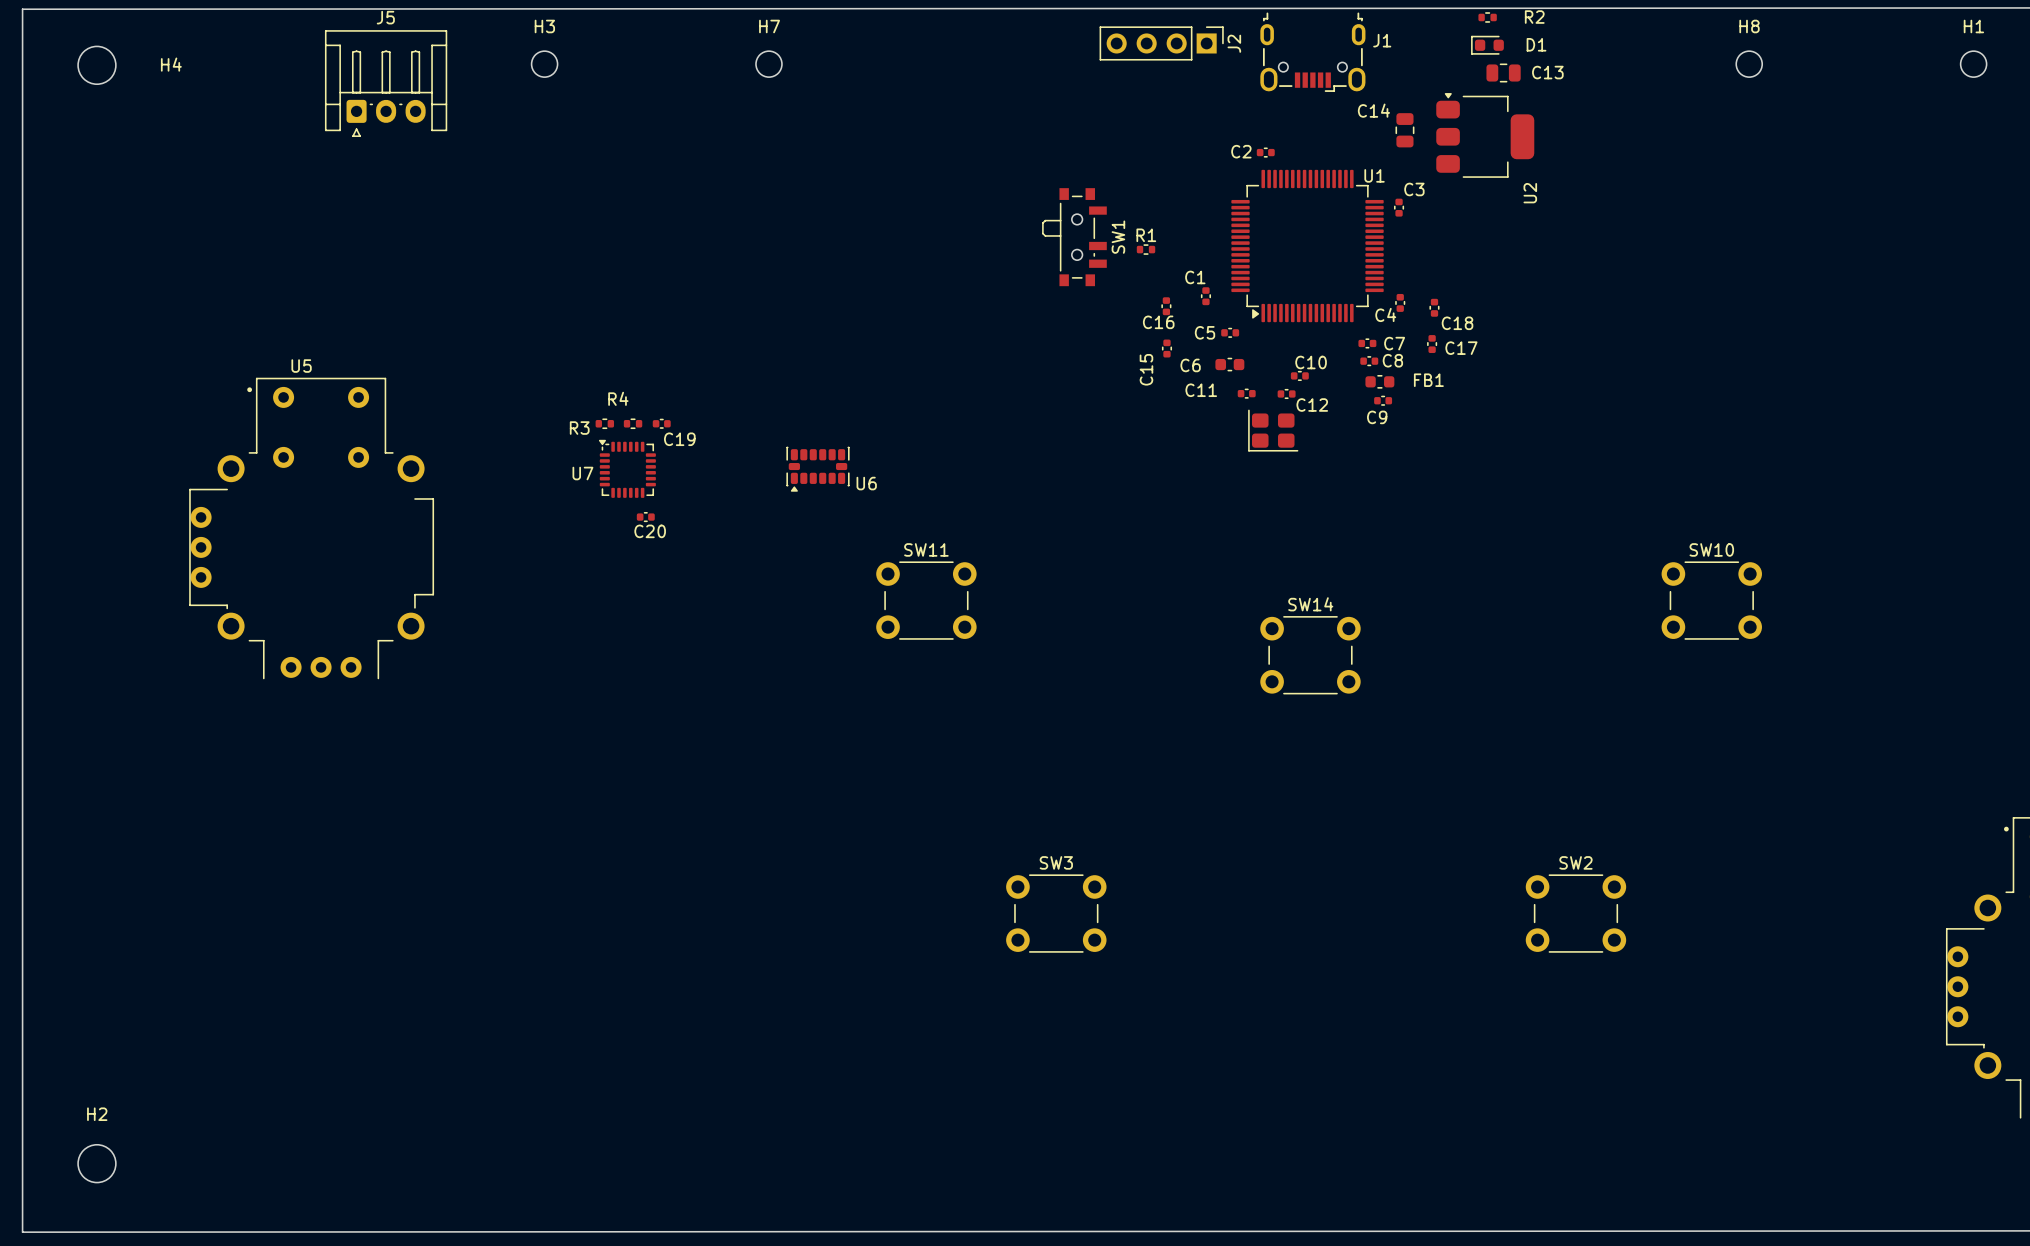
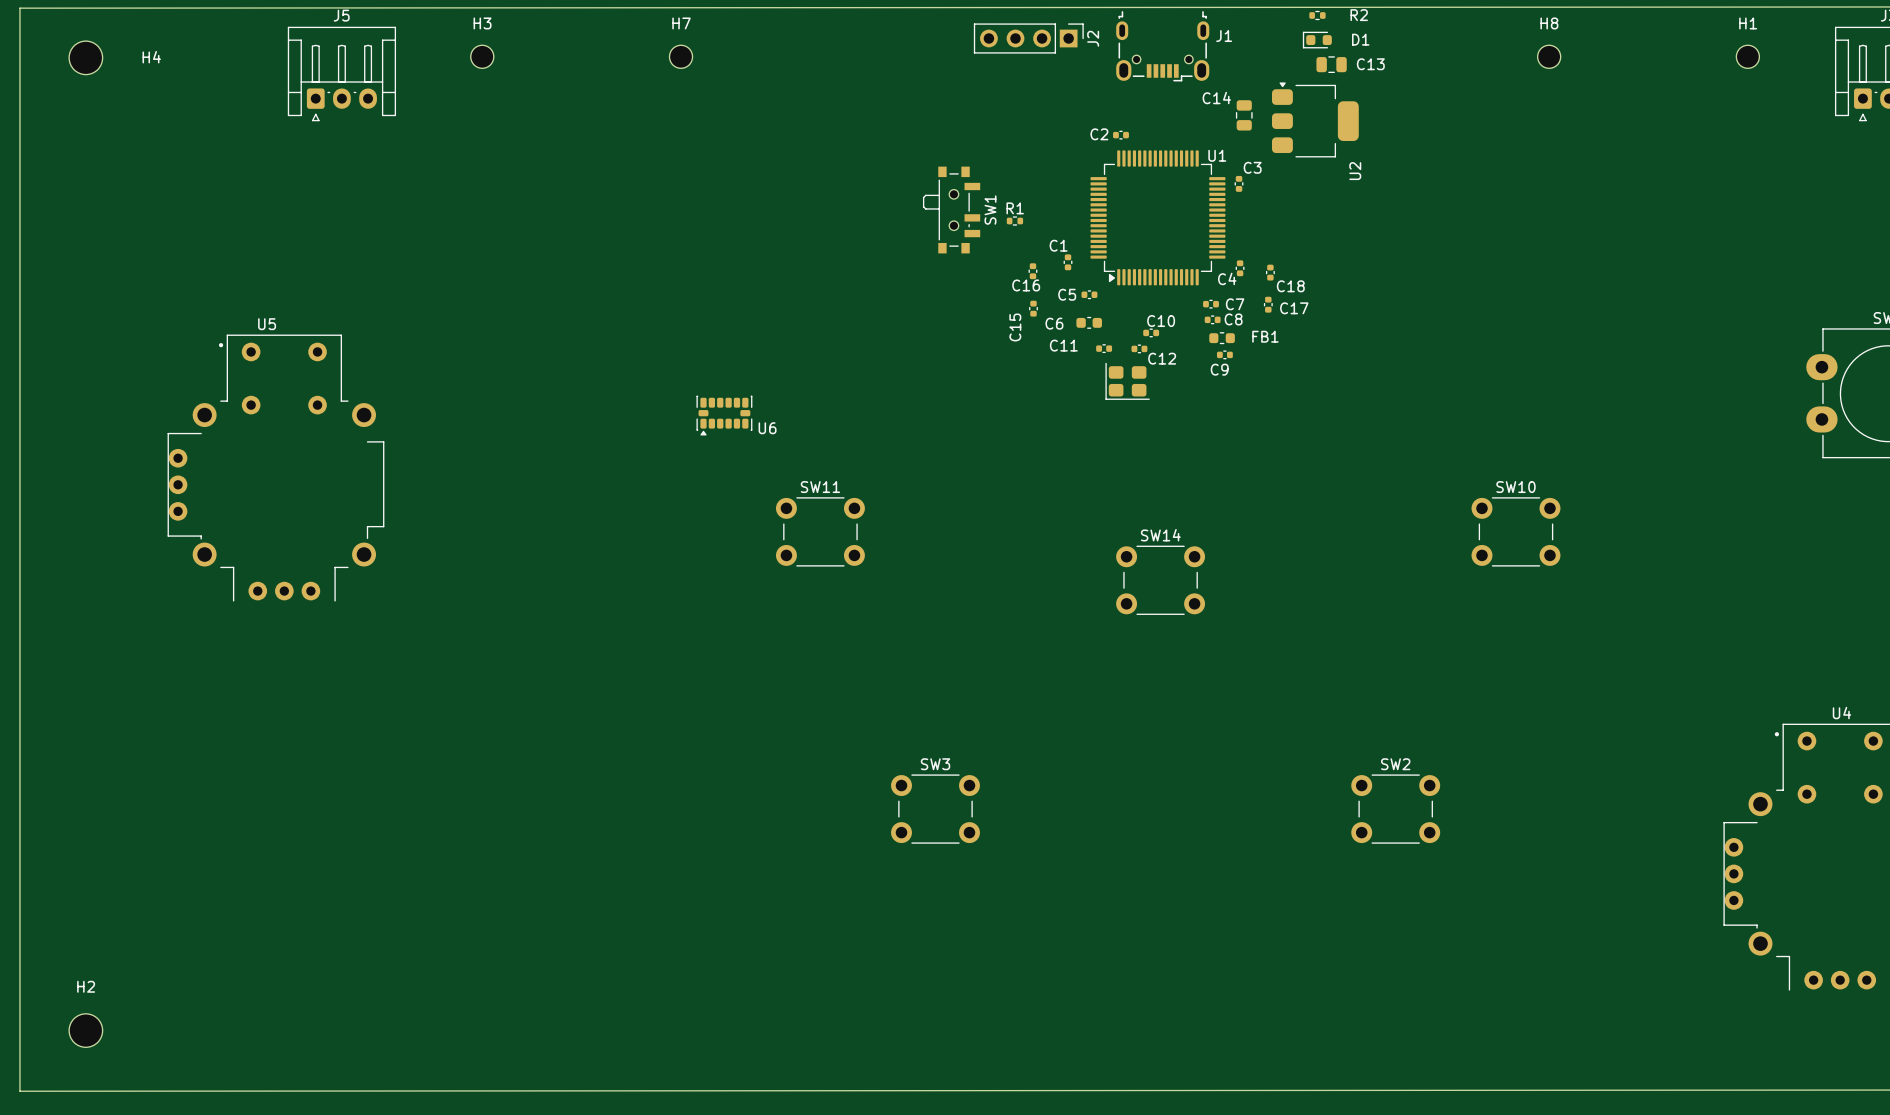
R3: (604, 423) -> none
R4: (633, 423) -> none
C19: (661, 423) -> none
U7: (627, 468) -> none
C20: (645, 517) -> none

